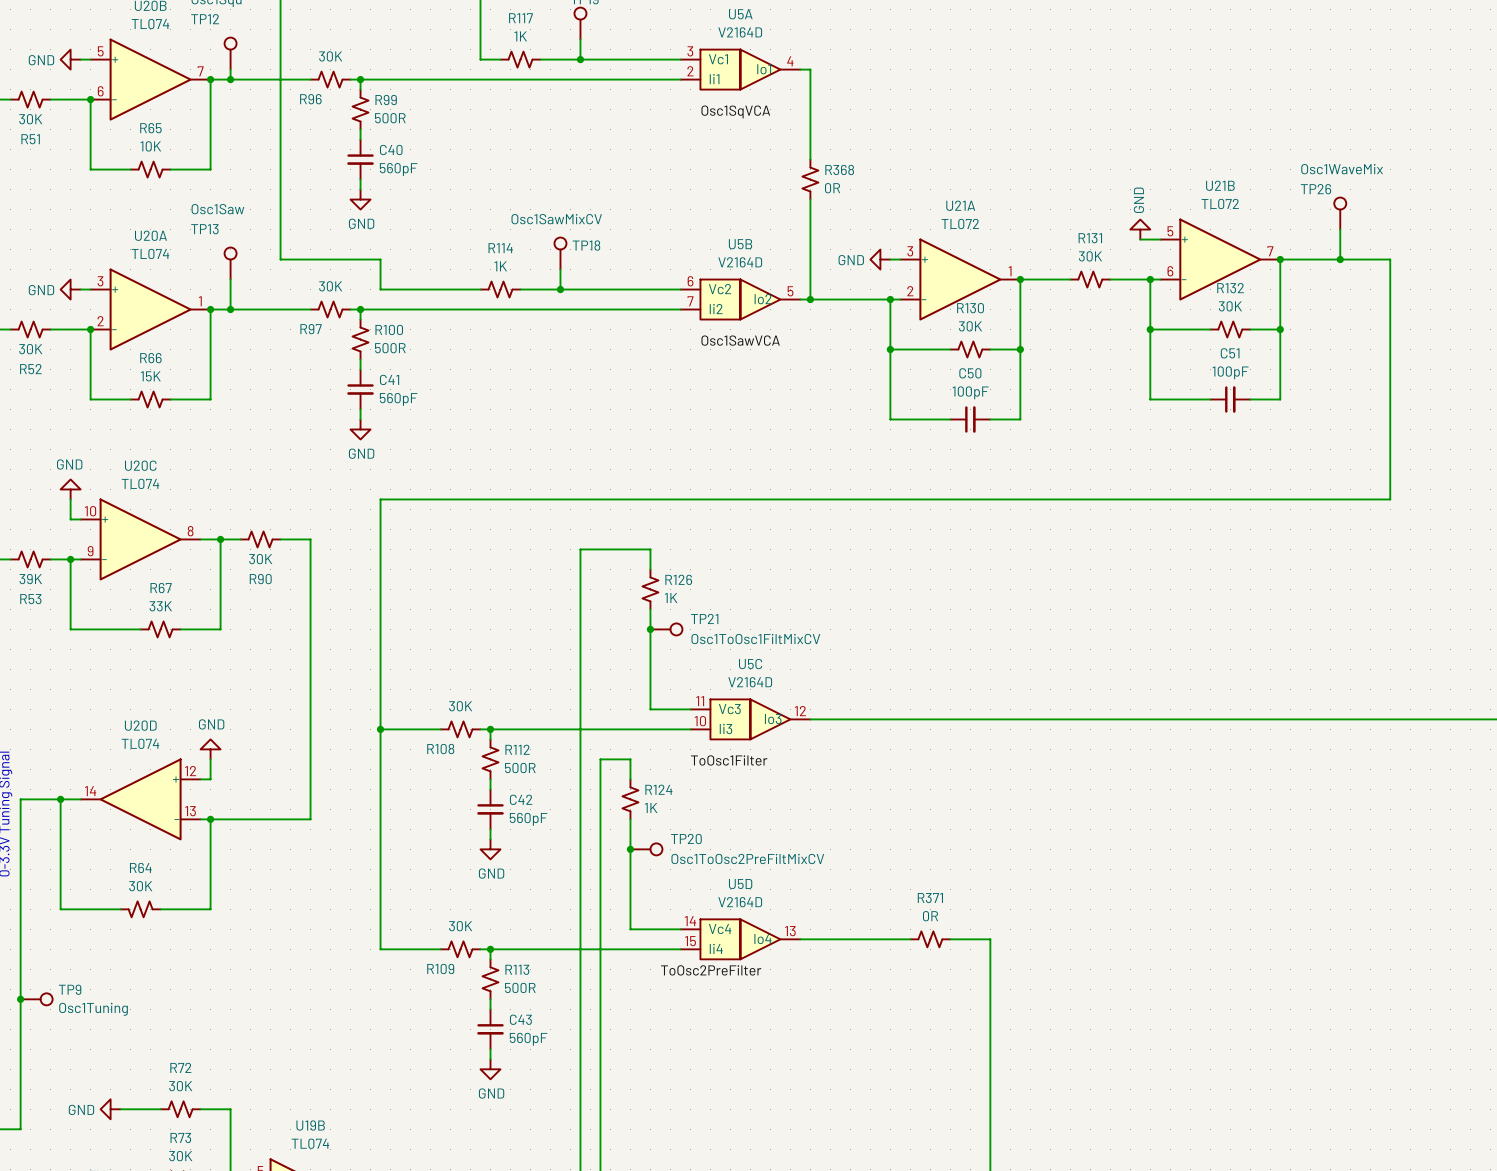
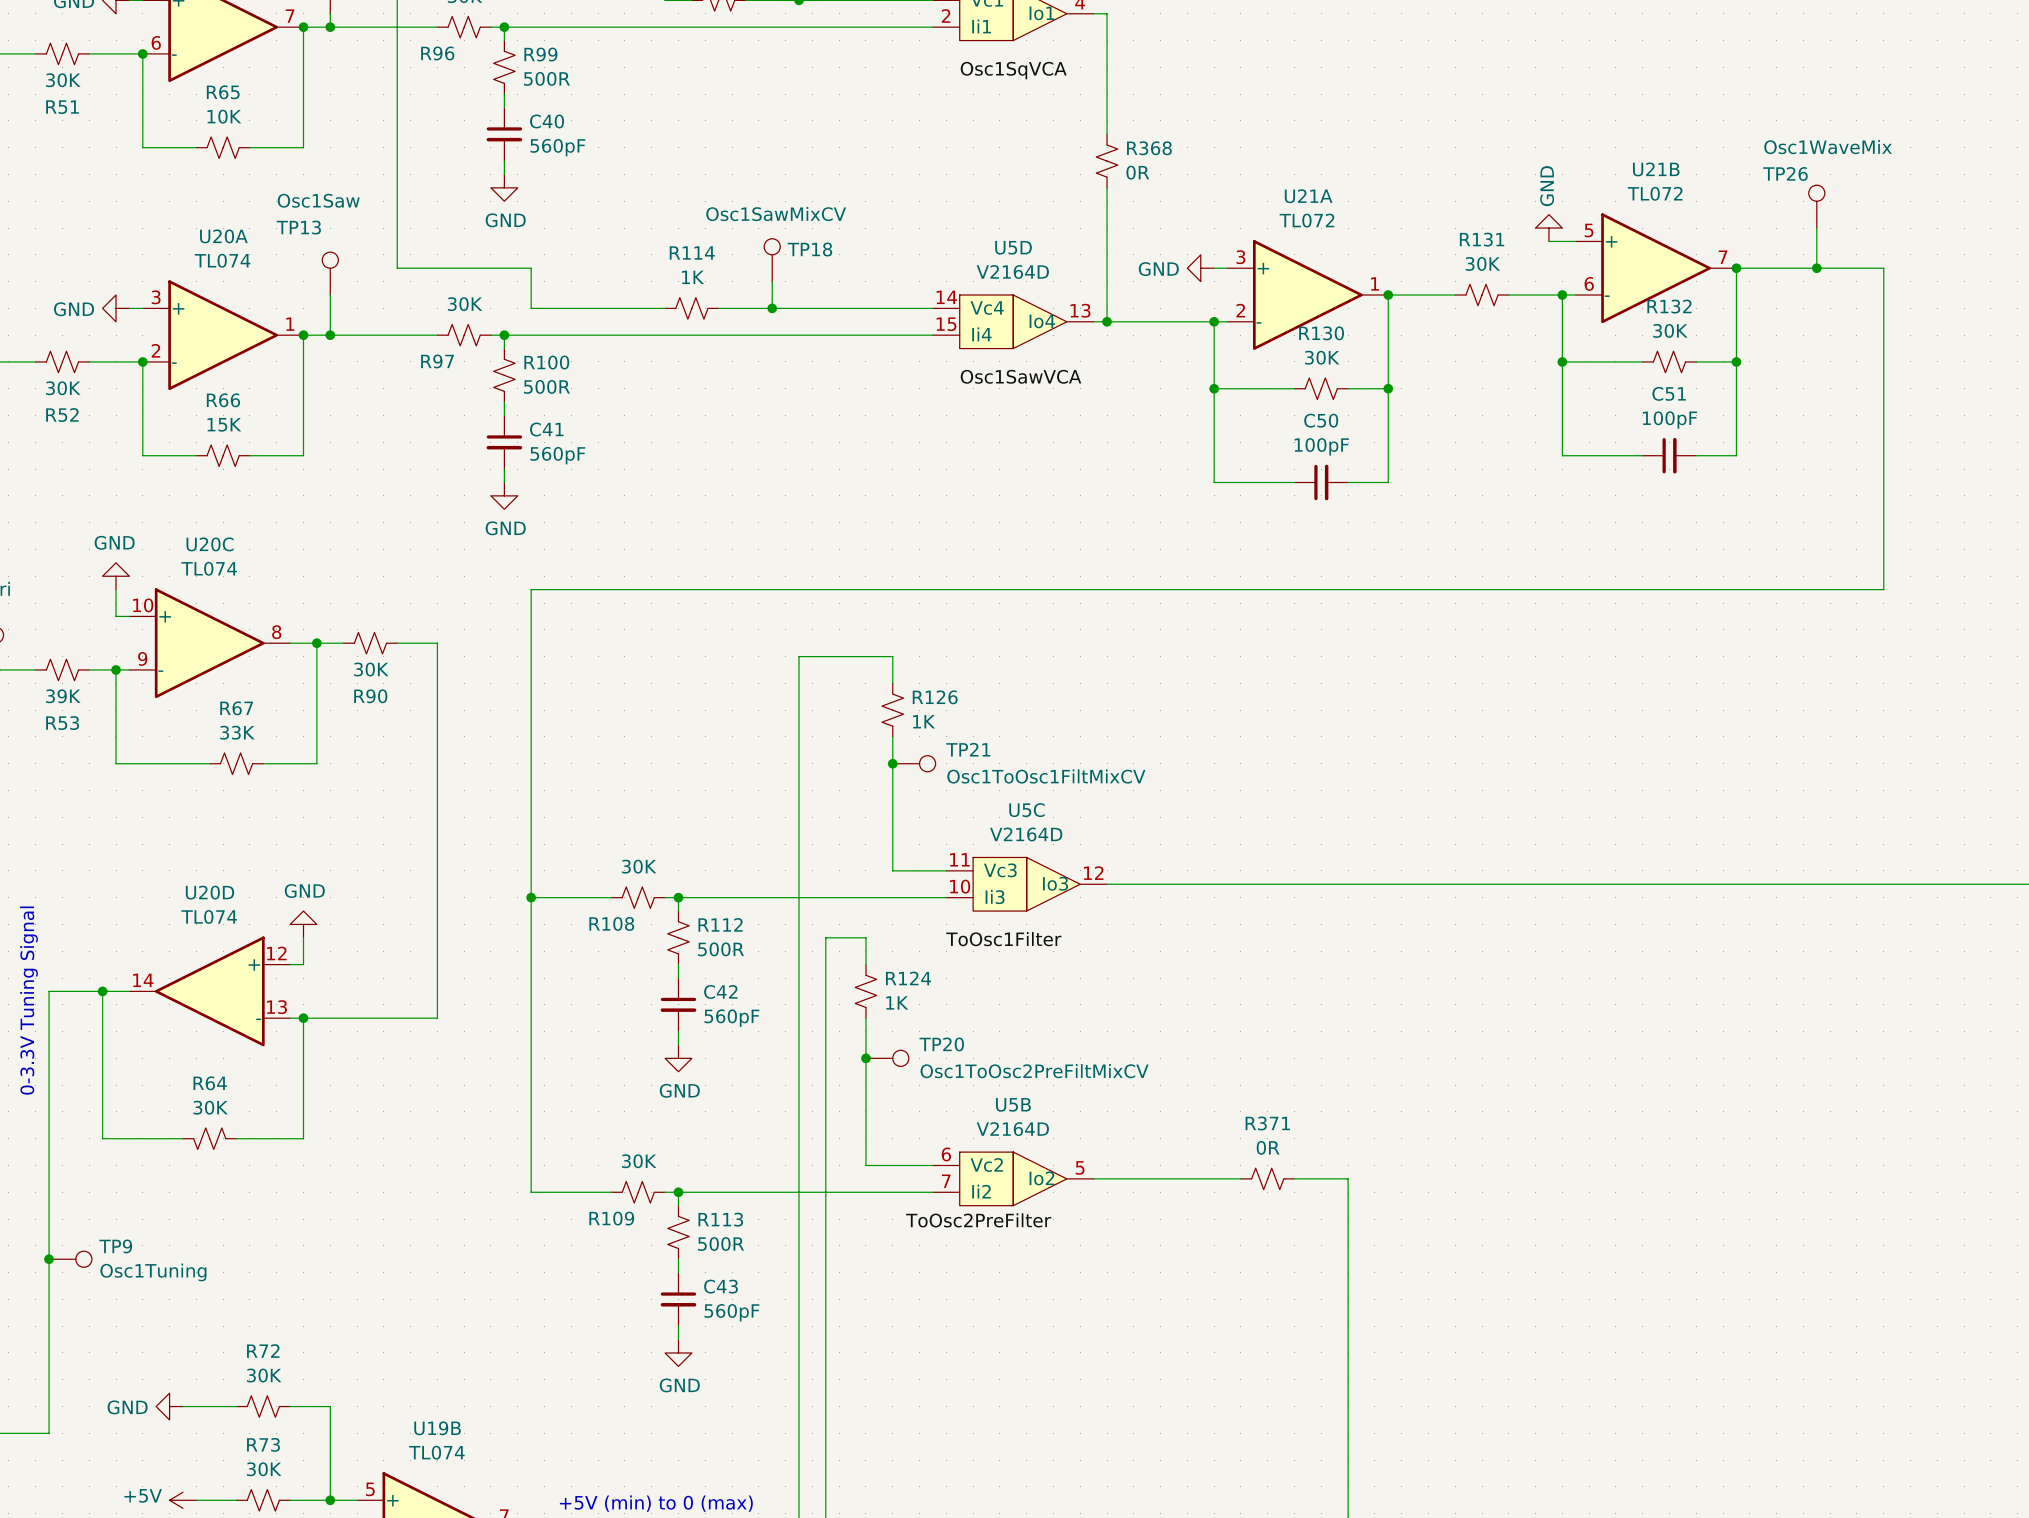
U5B position: (740, 299) -> (1013, 1178)
U5D position: (740, 939) -> (1013, 321)

